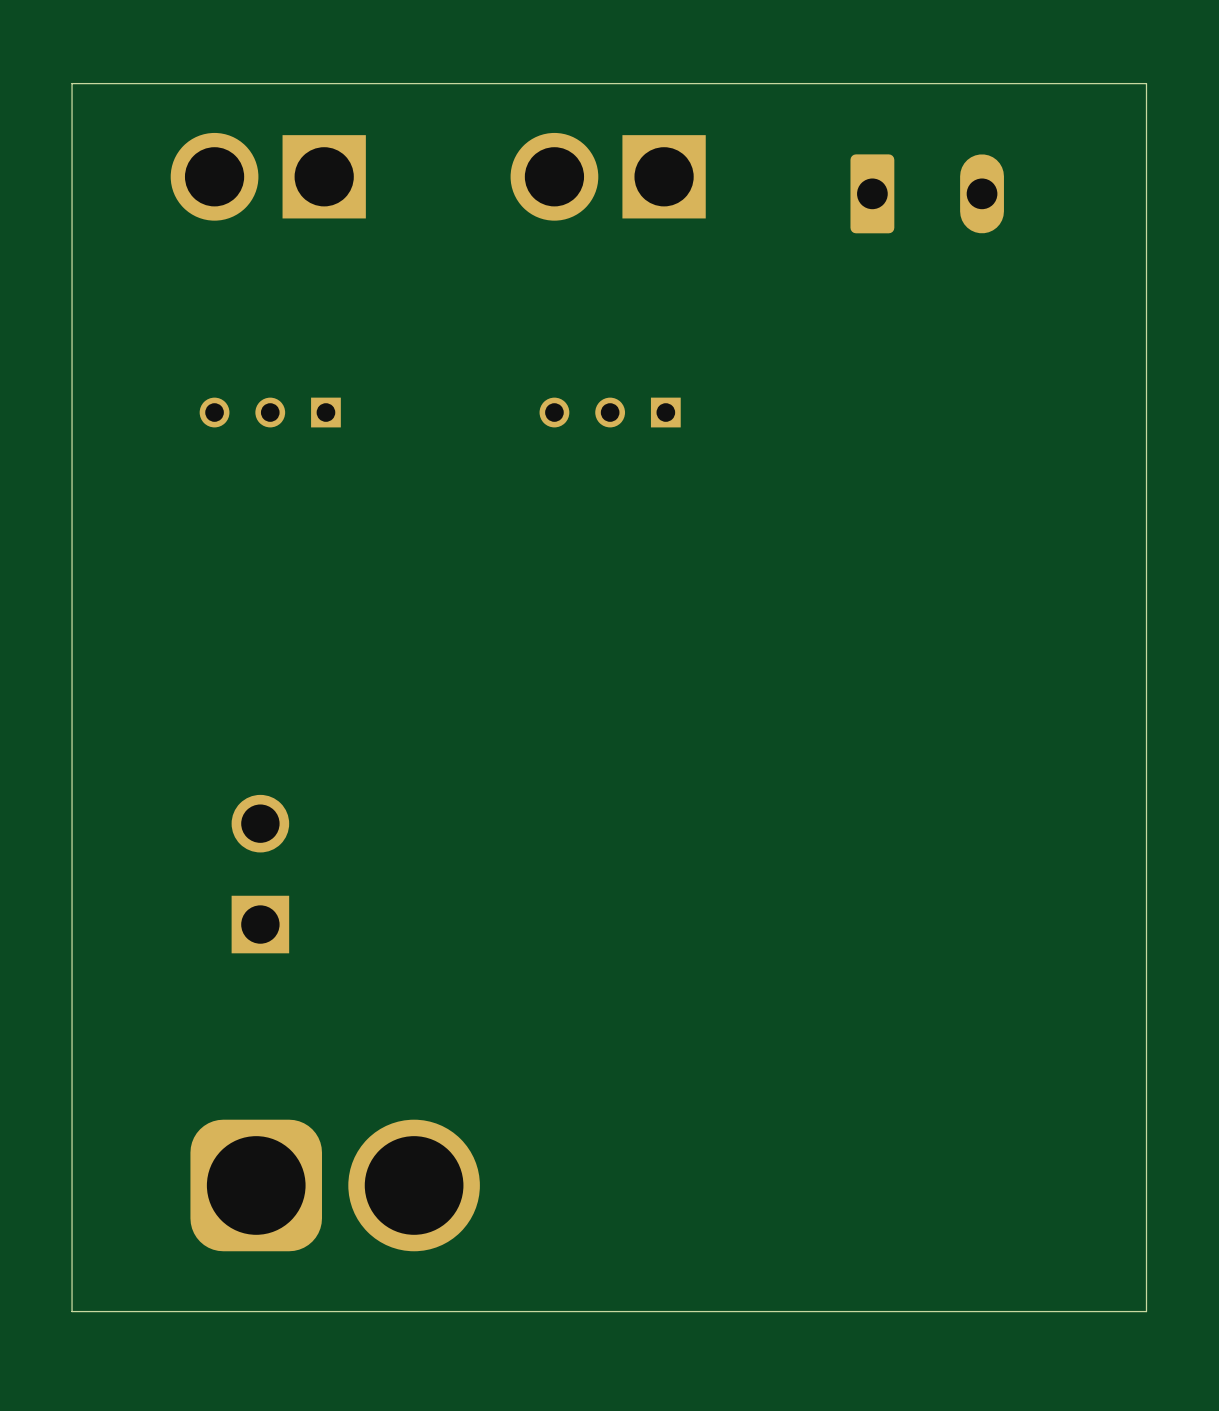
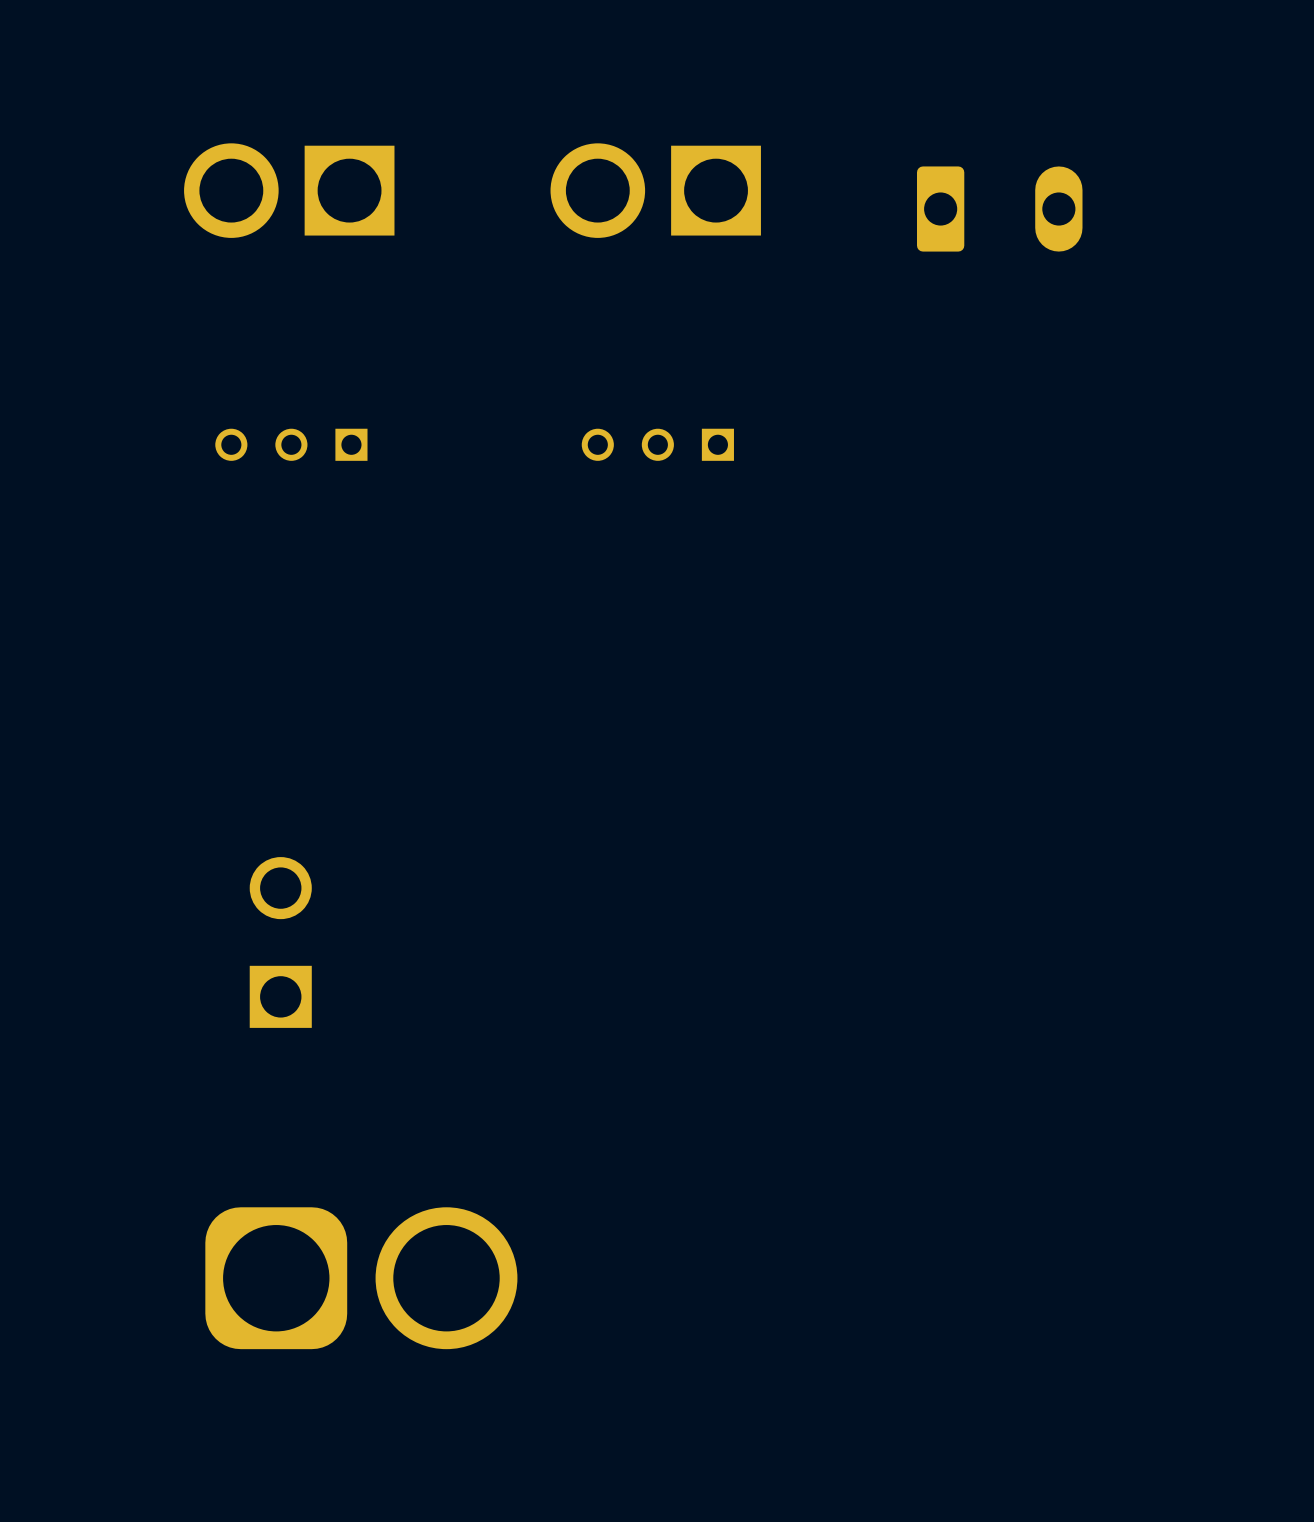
board edge: (1146, 83) (72, 83) (72, 1311) (1146, 1311) (1146, 83) -> none

